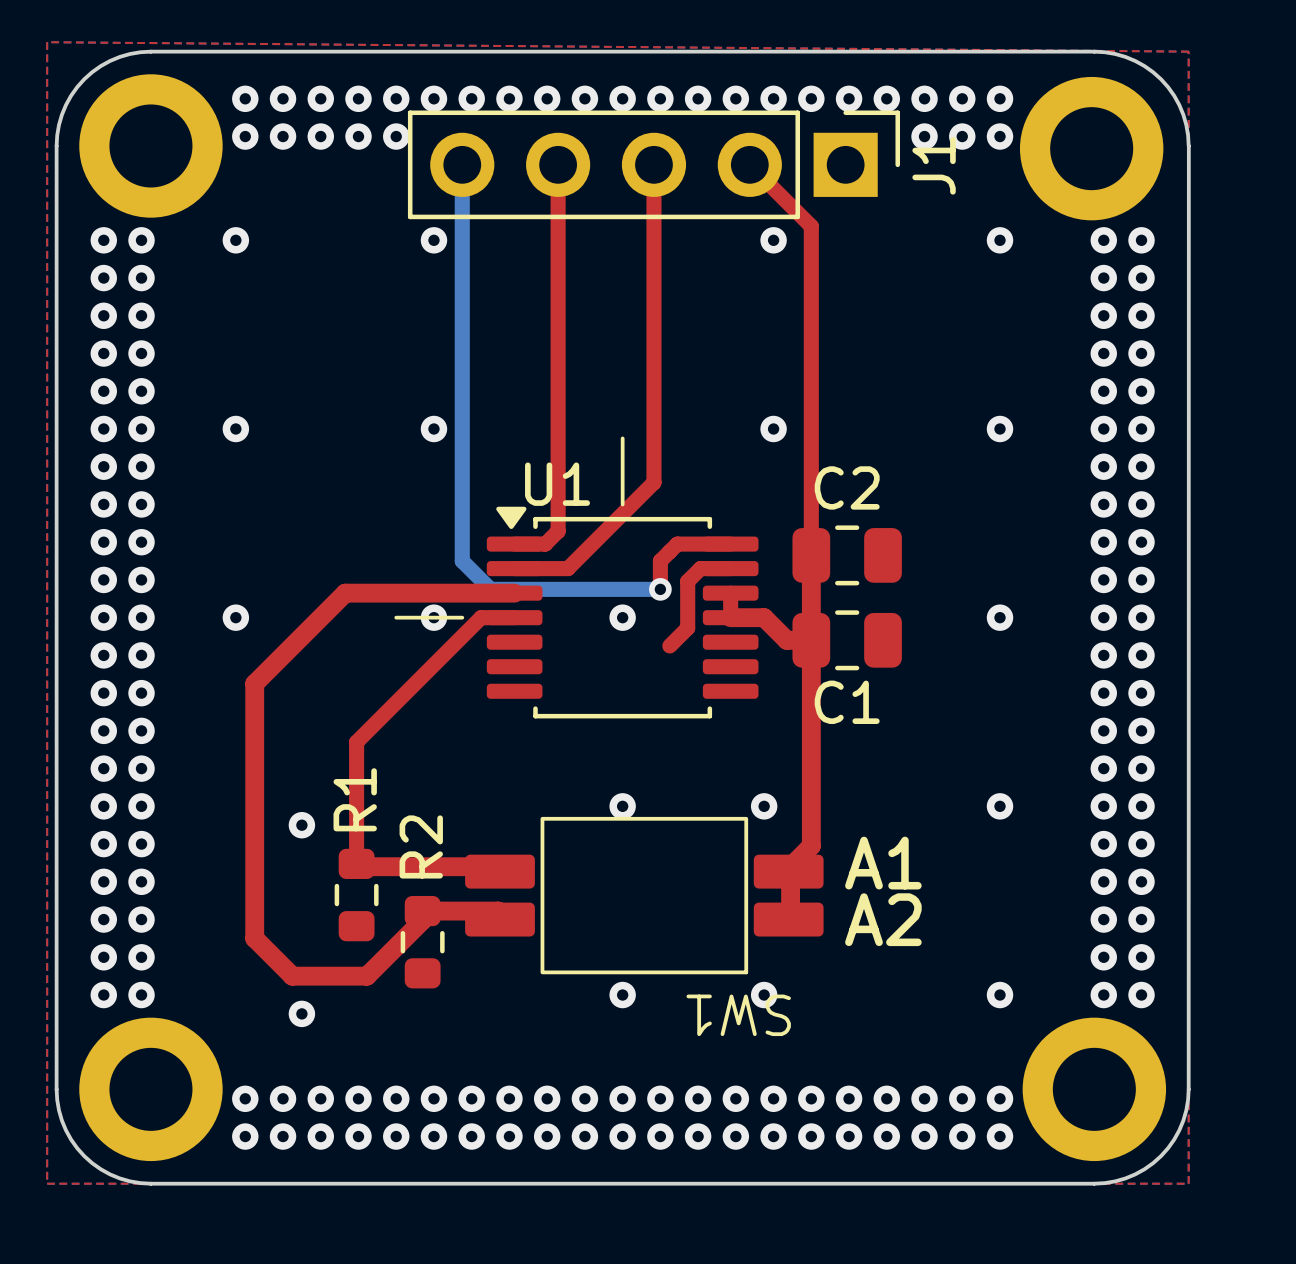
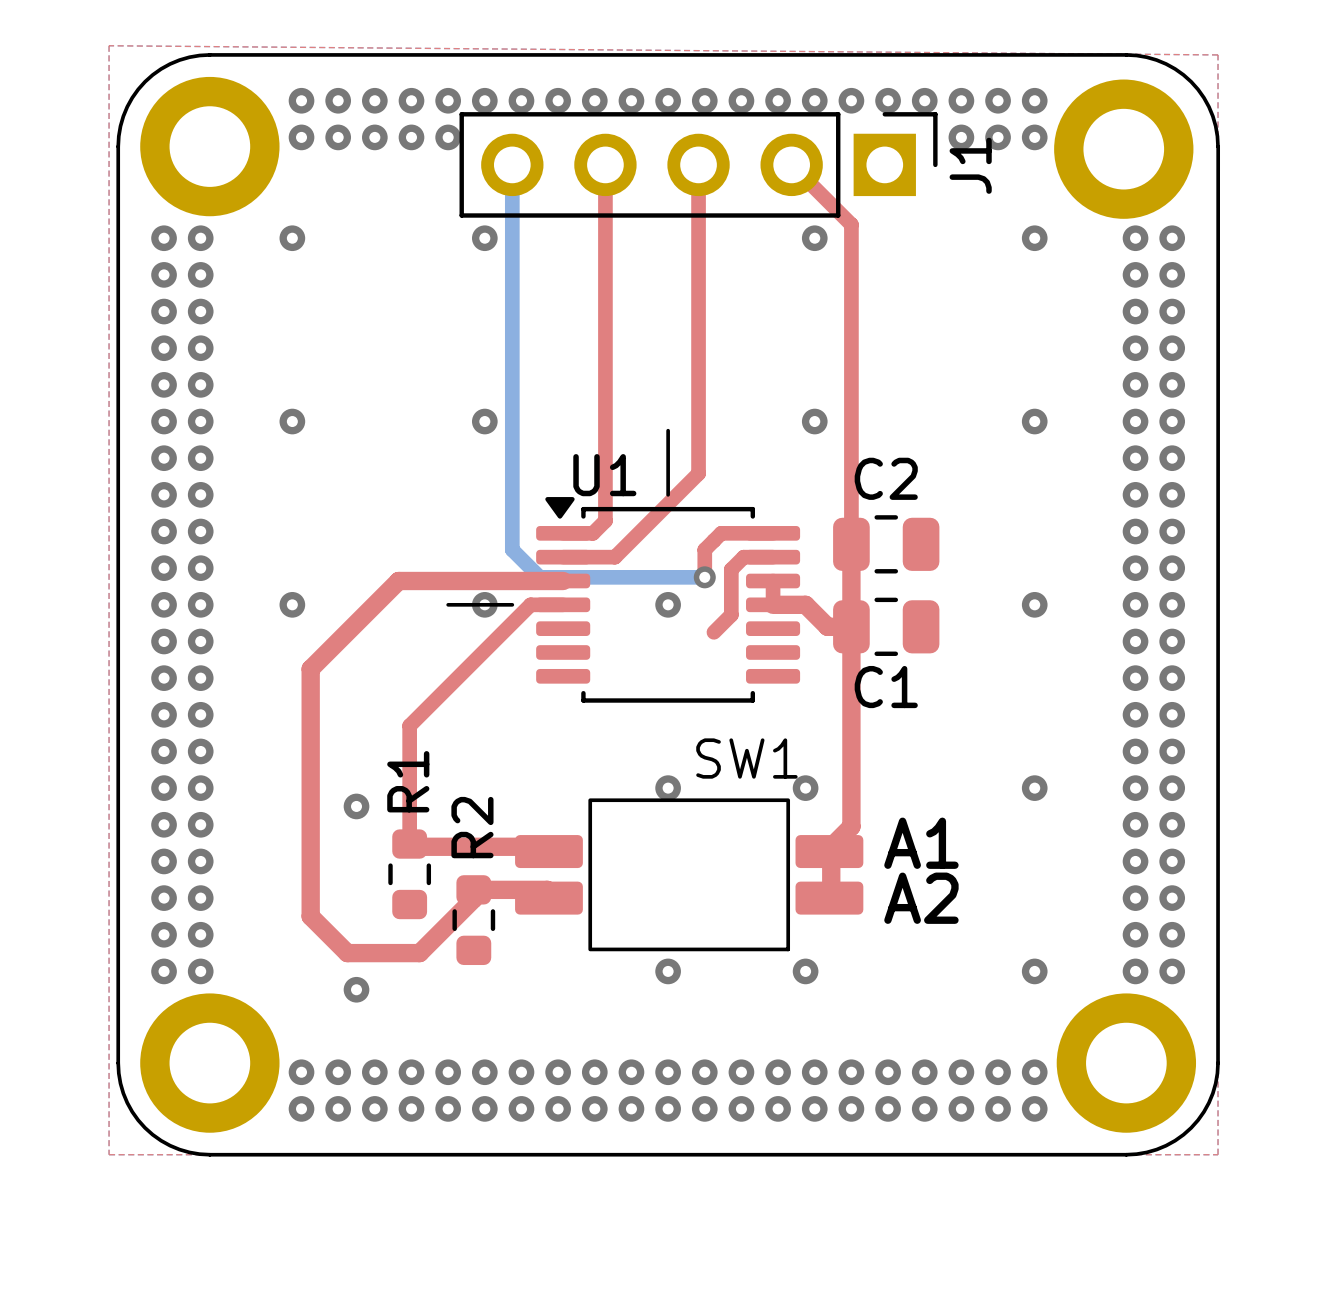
SW1 name rotation: 0° (738, 1015) -> 180° (746, 758)
SW1 name position: SW1 (738, 1015) -> SW1 (746, 758)

